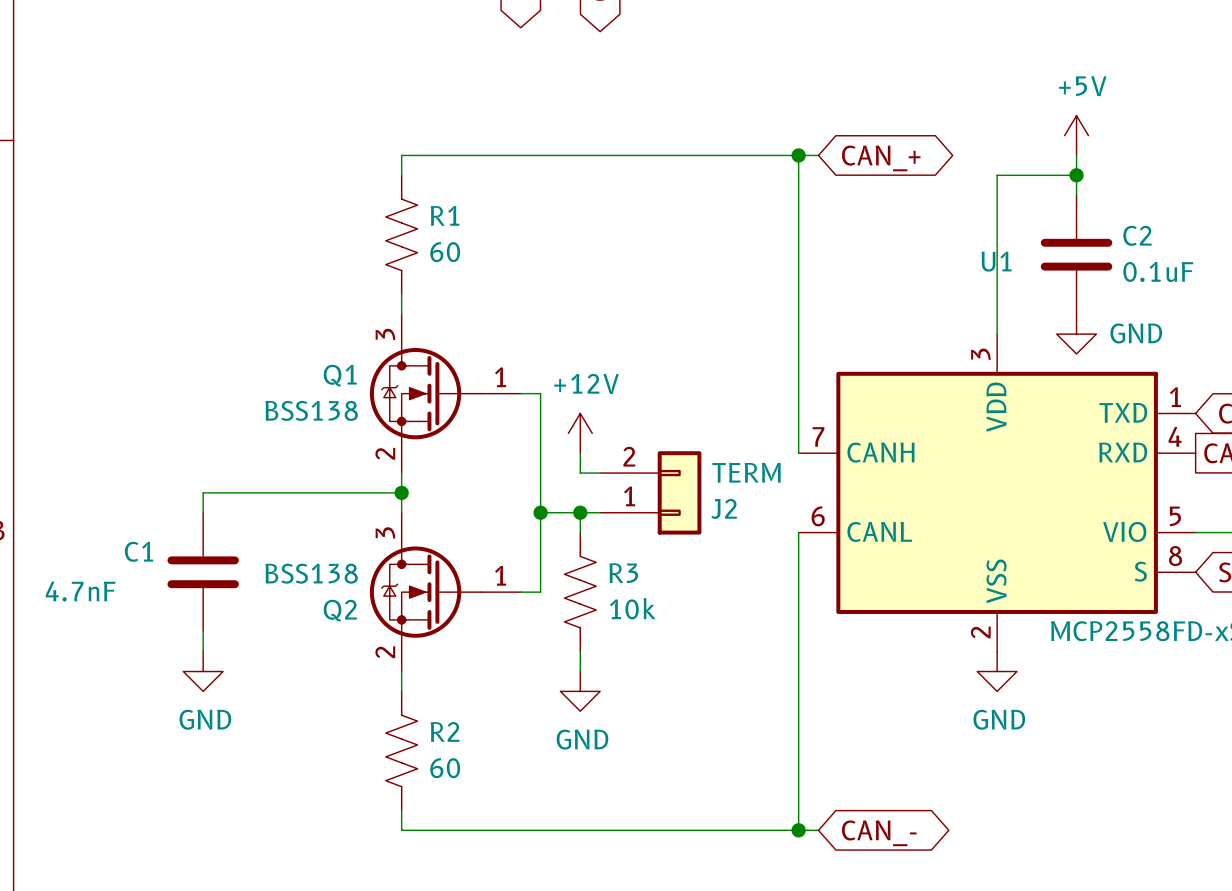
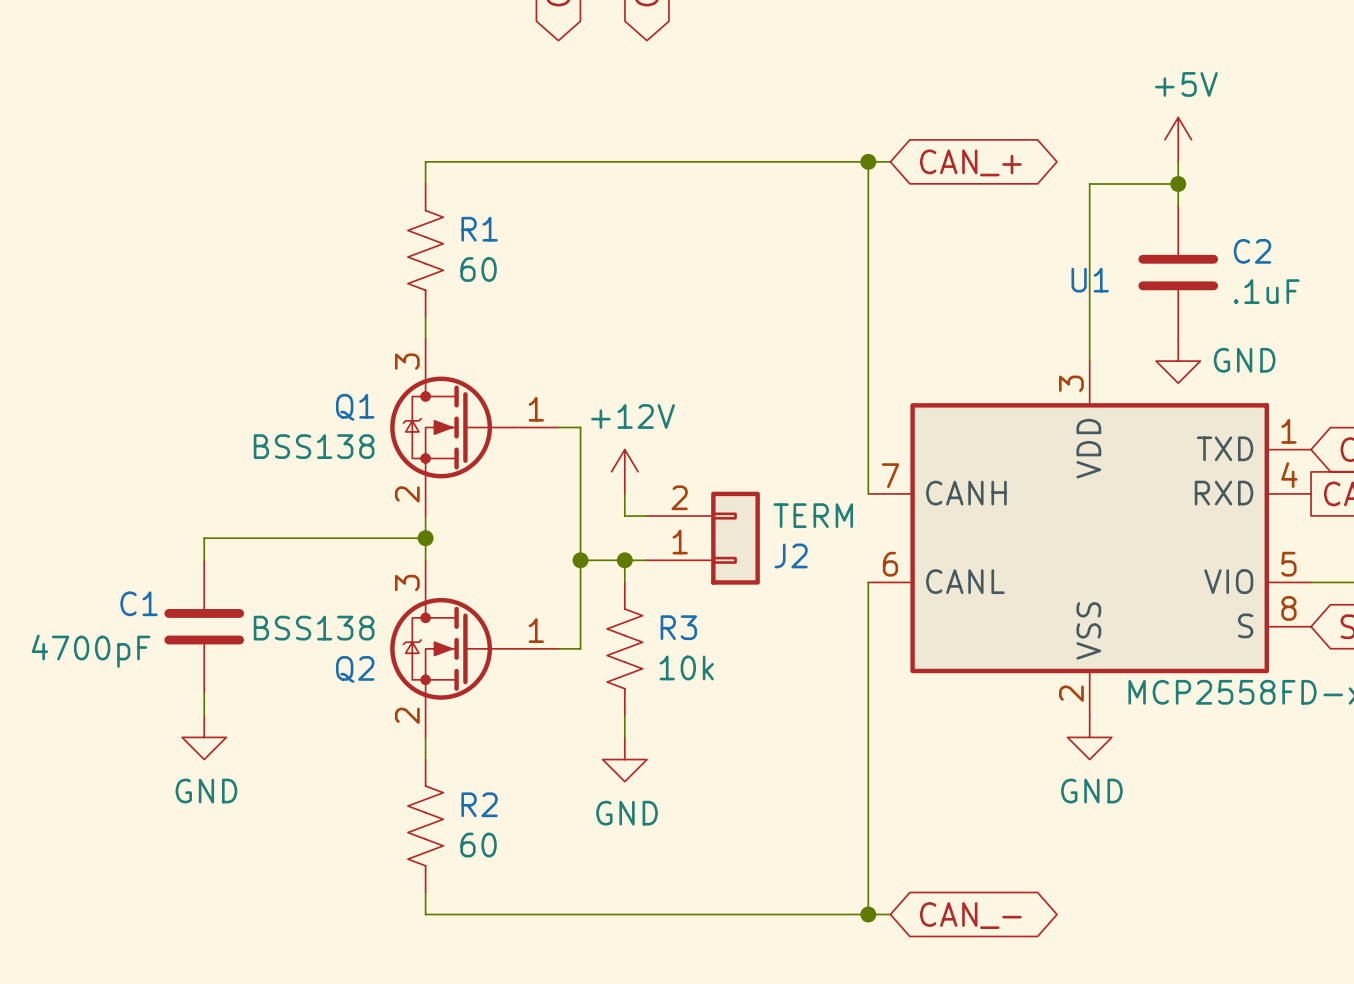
C2 value: 0.1uF (1158, 271) -> .1uF (1266, 291)
C1 value: 4.7nF (80, 591) -> 4700pF (91, 651)

